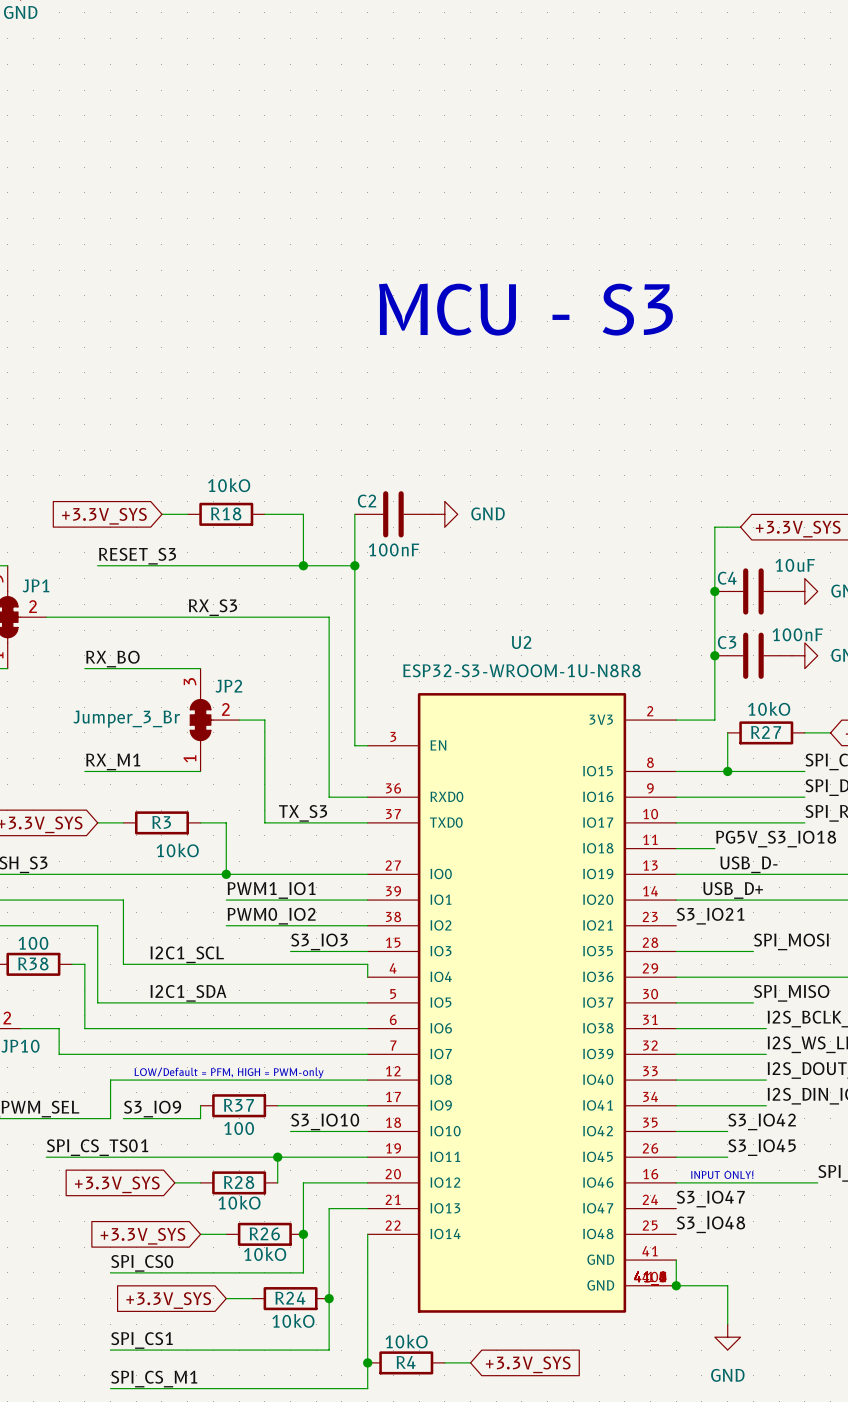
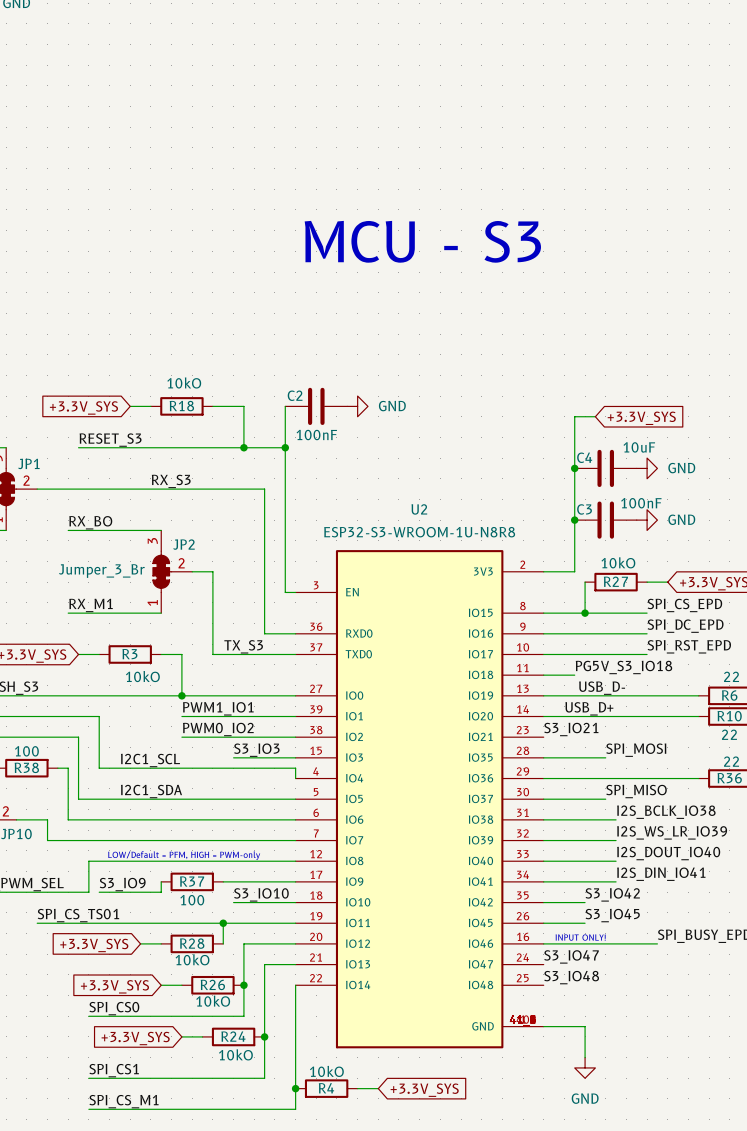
U2 symbol: [367, 693, 677, 1313] -> [295, 550, 544, 1049]
wire: (676, 1260) (676, 1285) -> none
junction: (676, 1285) -> none

